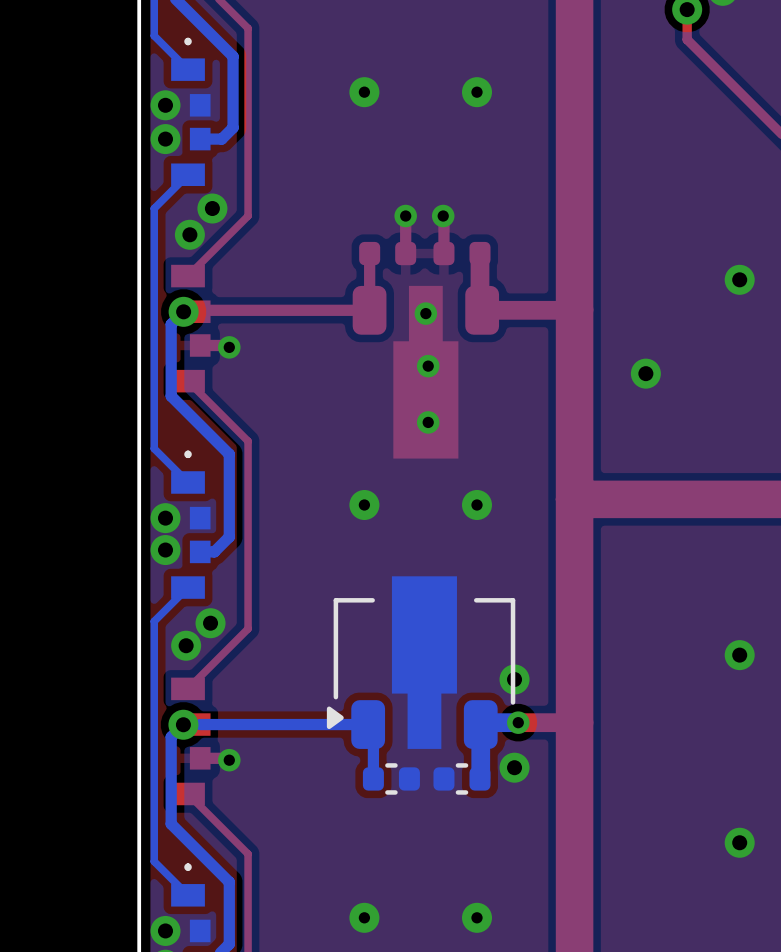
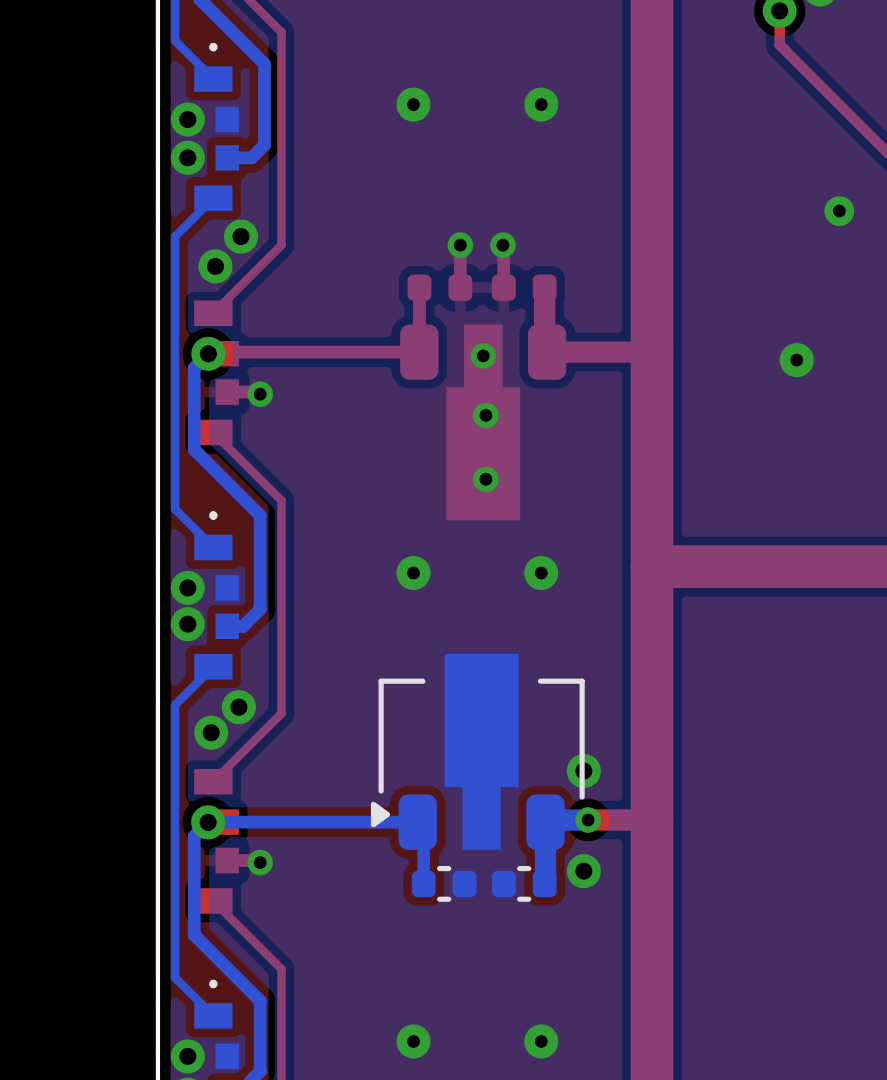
via: none -> (839, 211)
via: (739, 279) -> none
via: none -> (796, 360)
via: (645, 373) -> none
via: (739, 655) -> none
via: (739, 842) -> none

